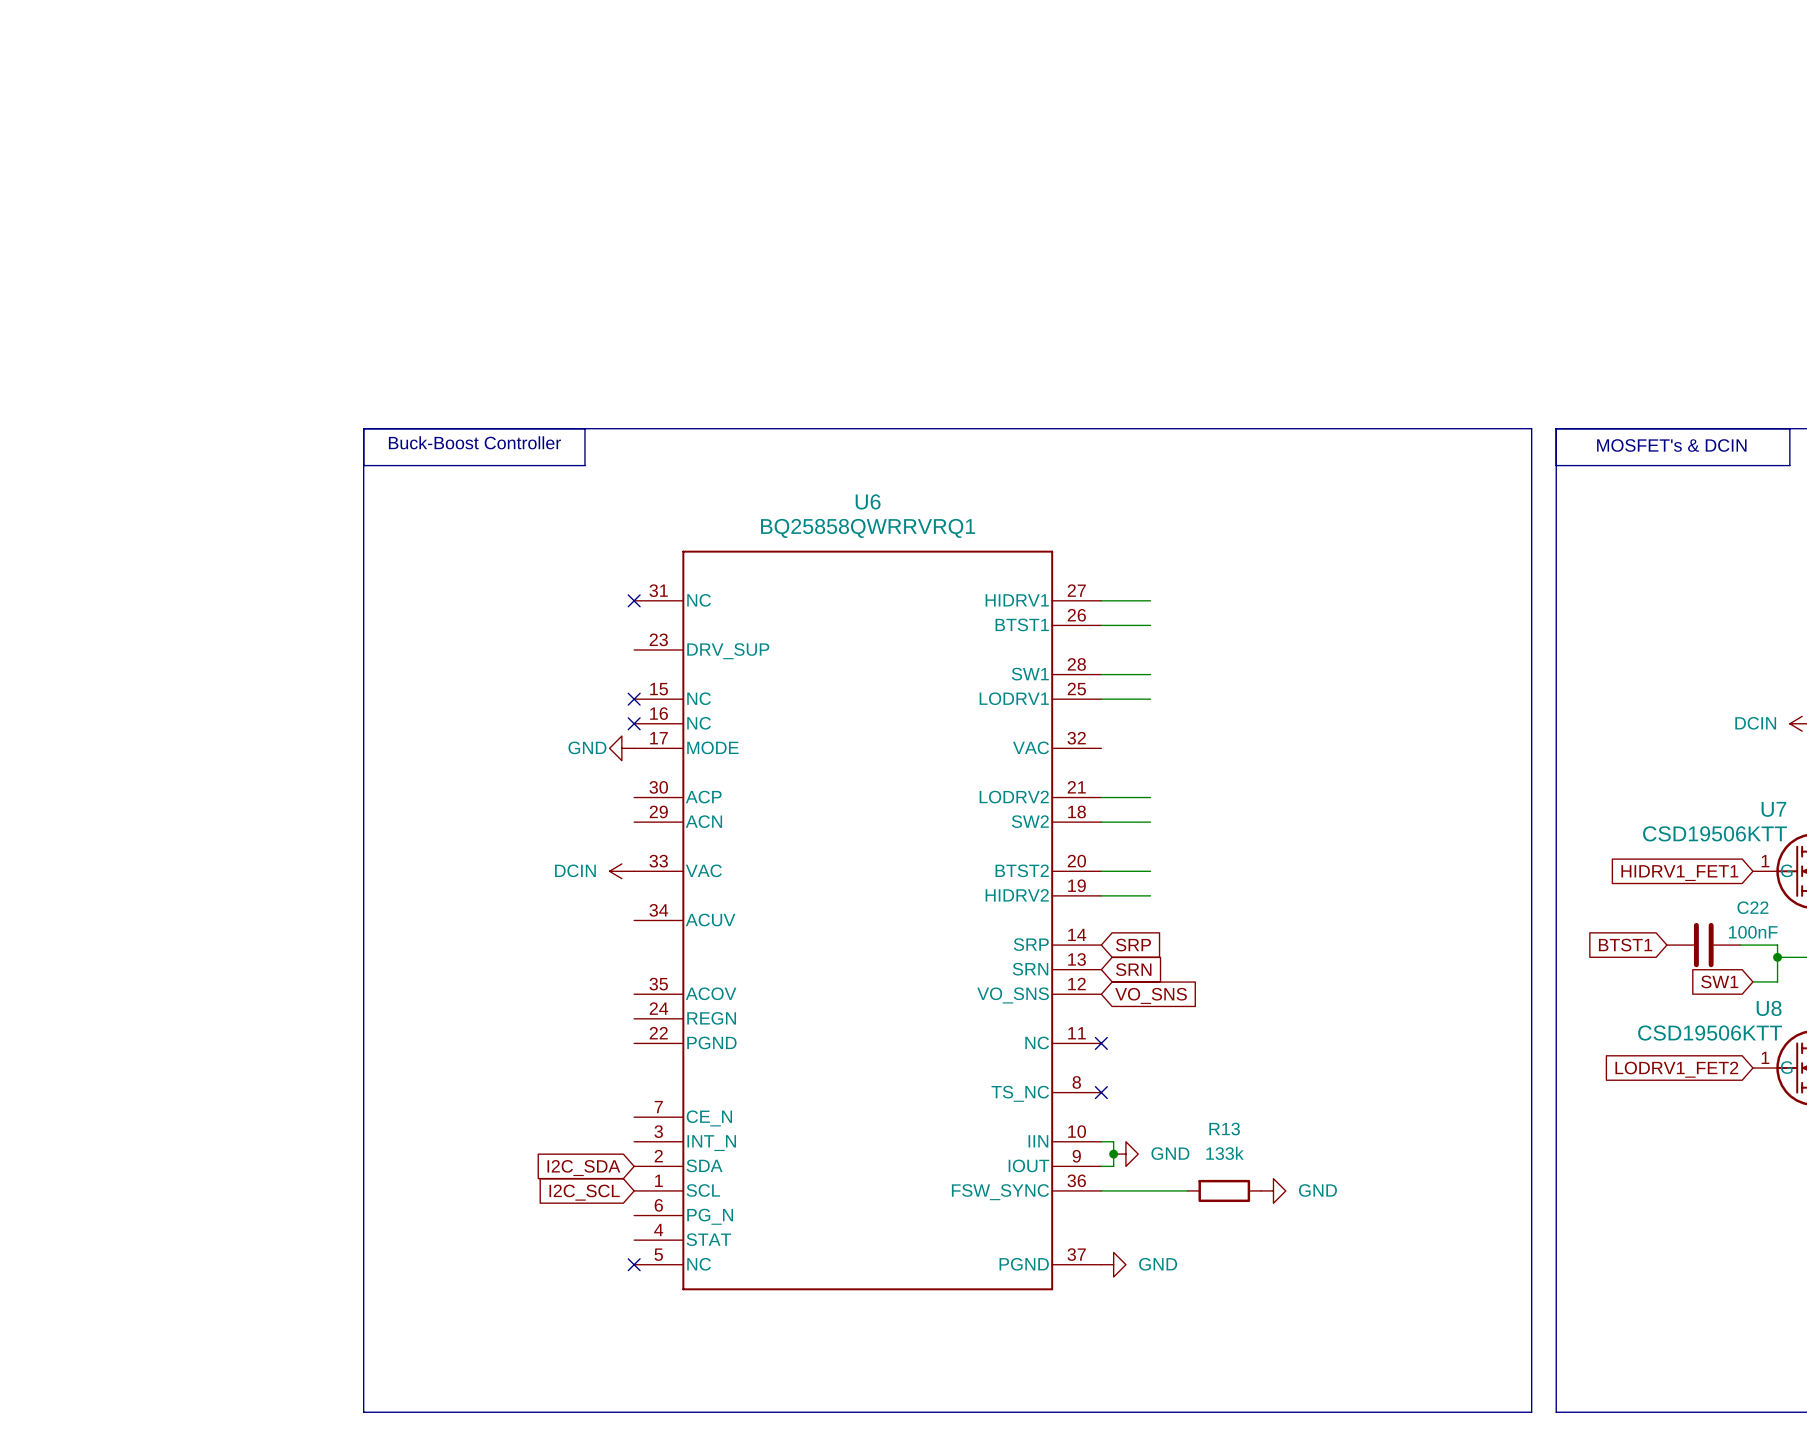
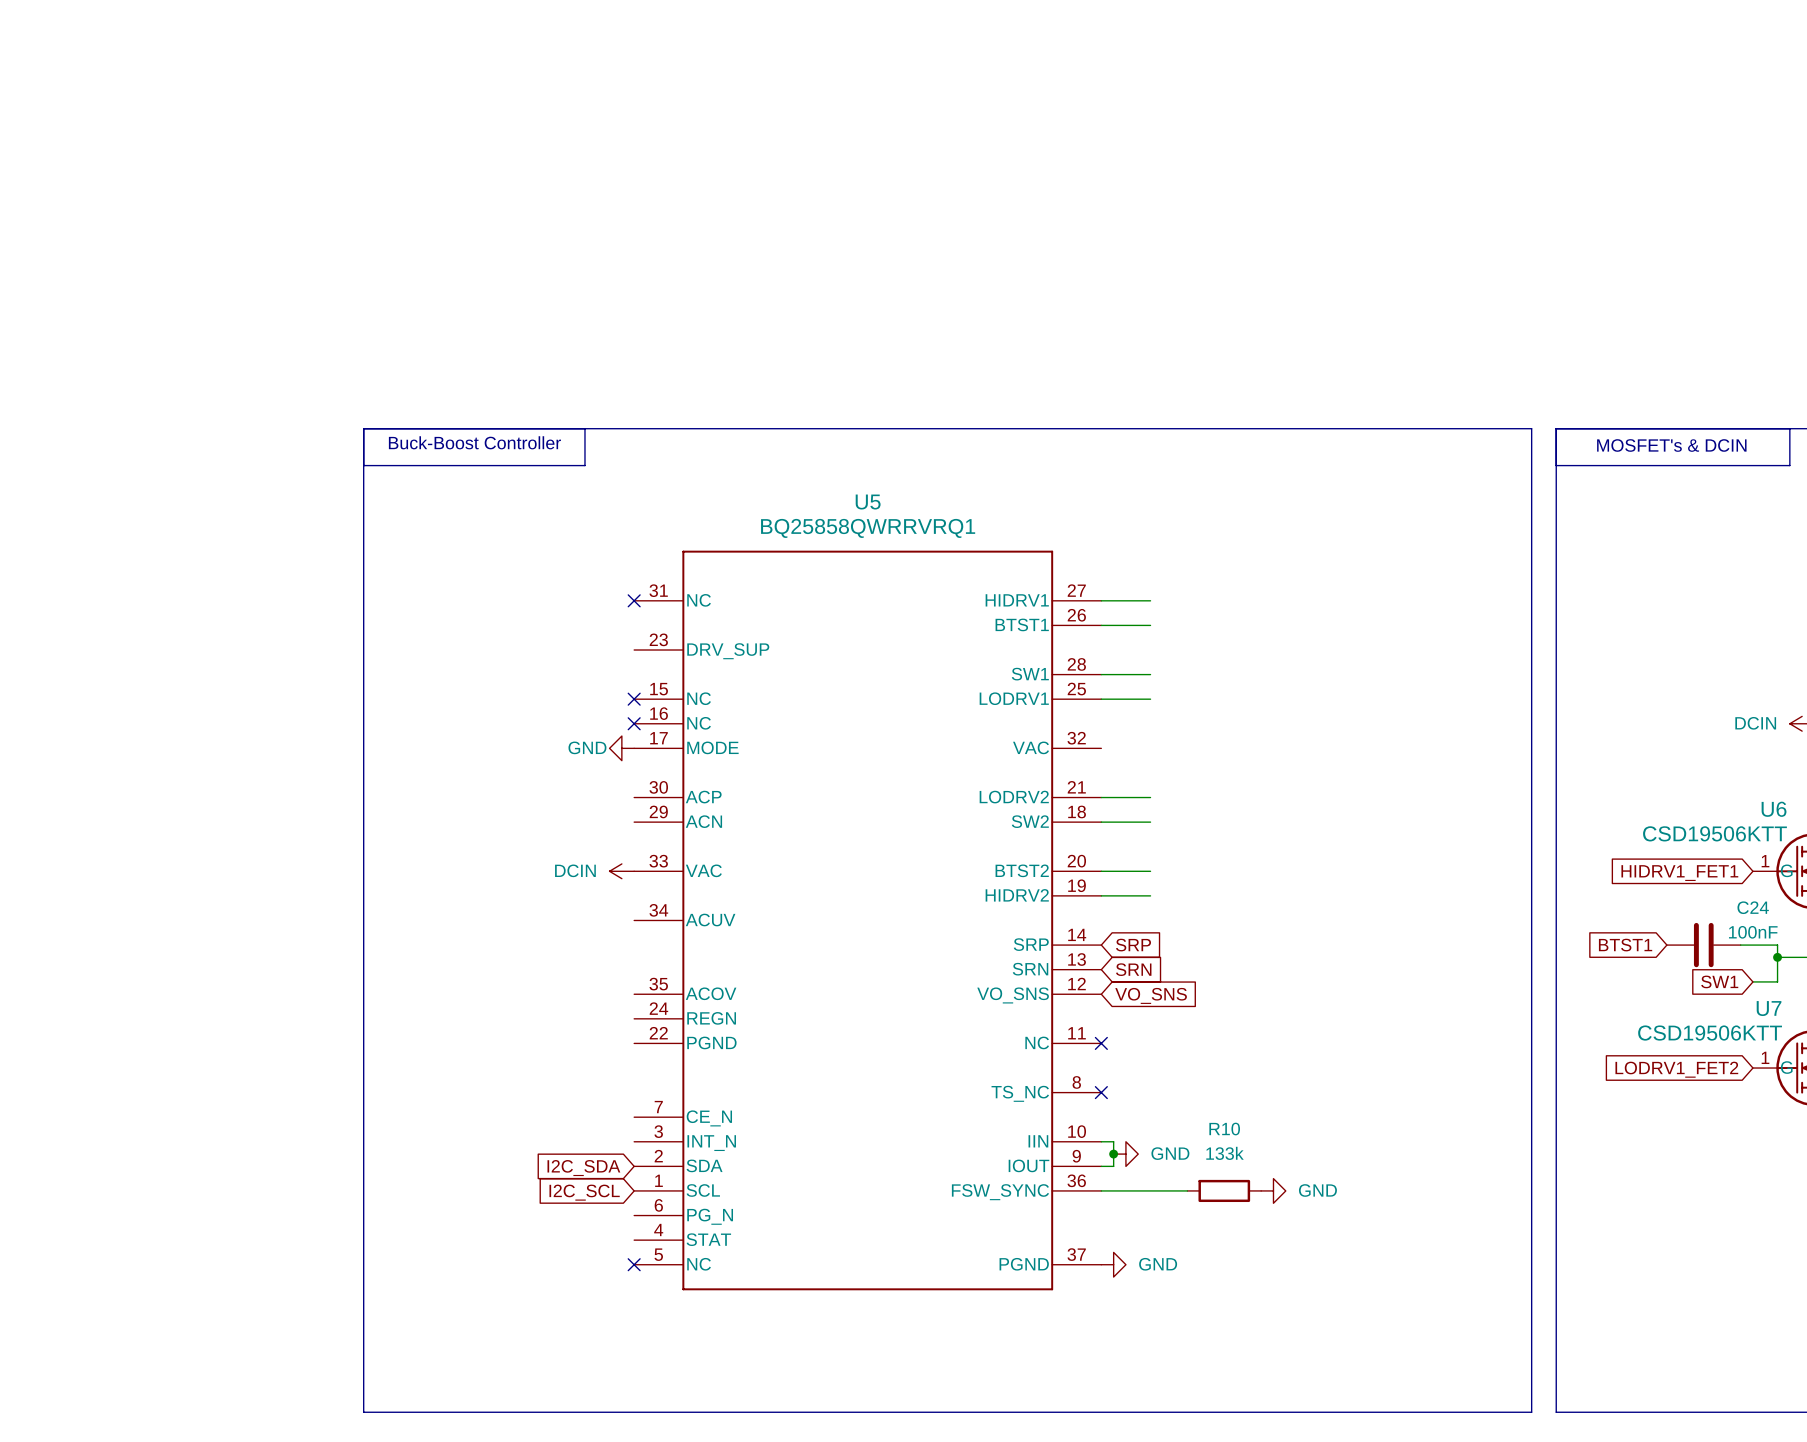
U6 name: U6 (868, 501) -> U5 (868, 502)
U7 name: U7 (1773, 809) -> U6 (1774, 809)
C22 name: C22 (1752, 907) -> C24 (1753, 907)
U8 name: U8 (1769, 1008) -> U7 (1769, 1008)
R13 name: R13 (1224, 1129) -> R10 (1224, 1129)

